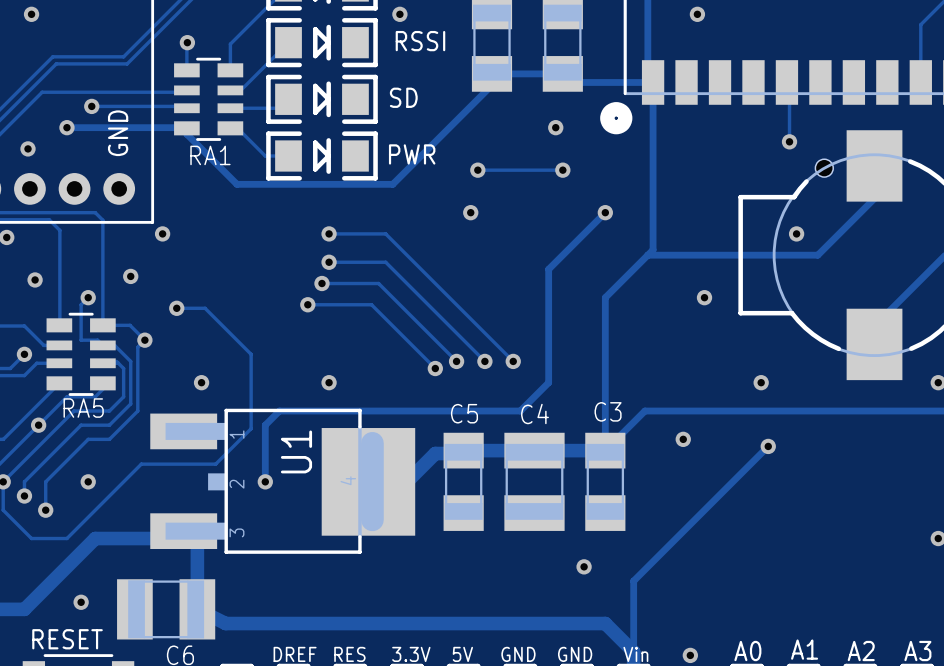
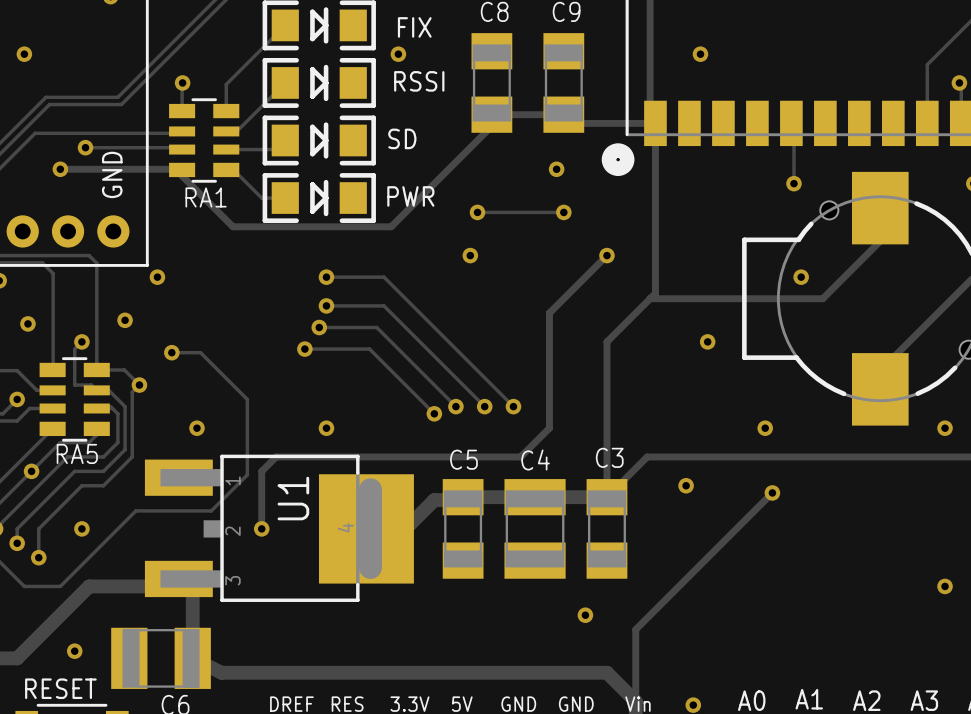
via: (28, 148) -> none

